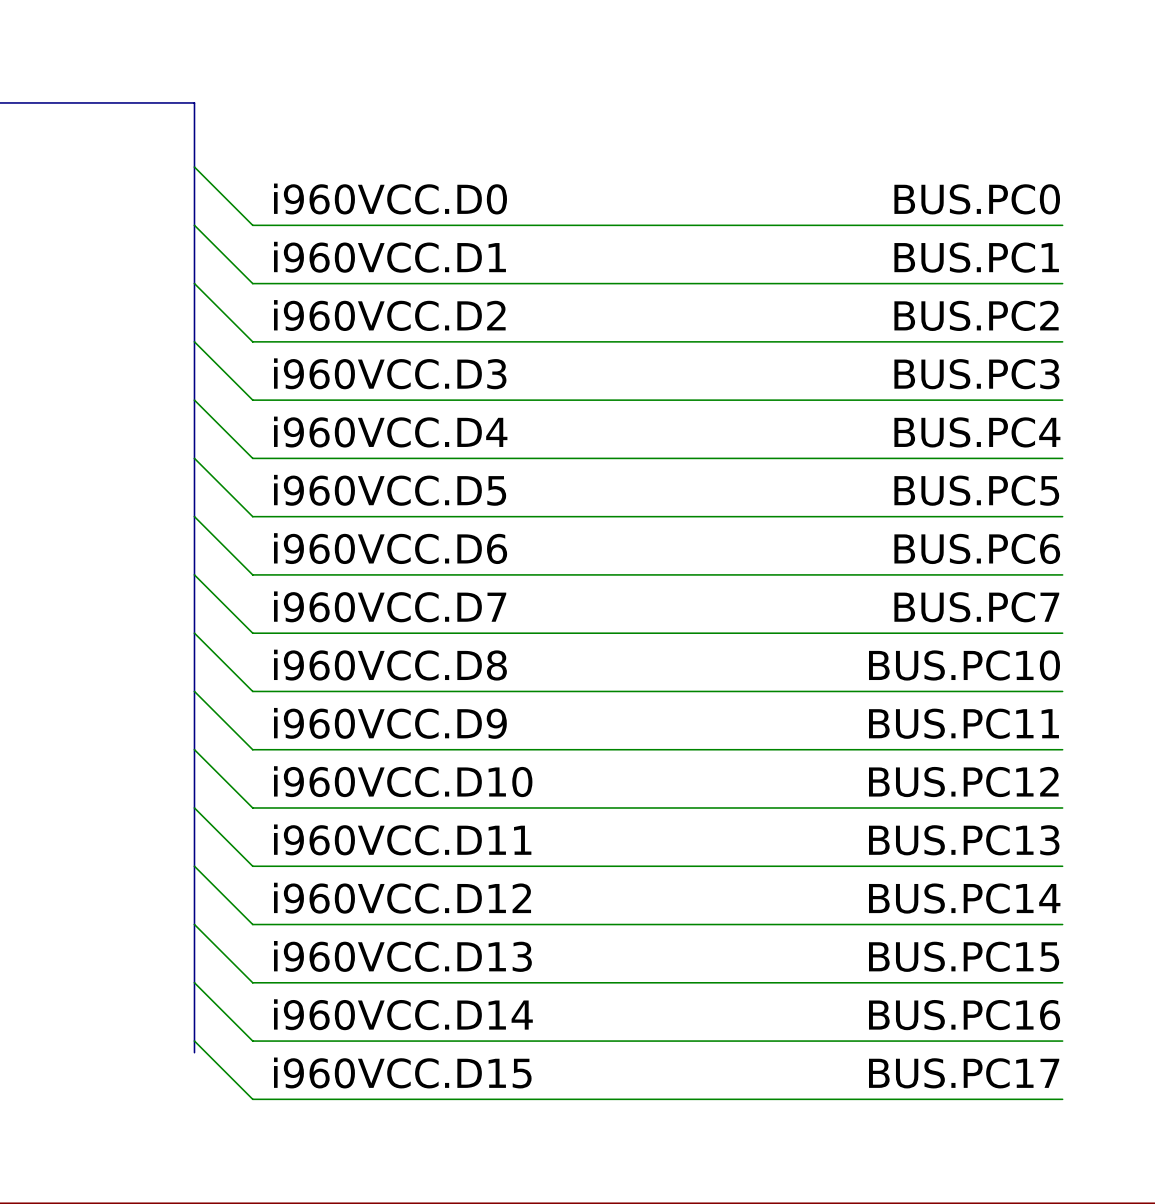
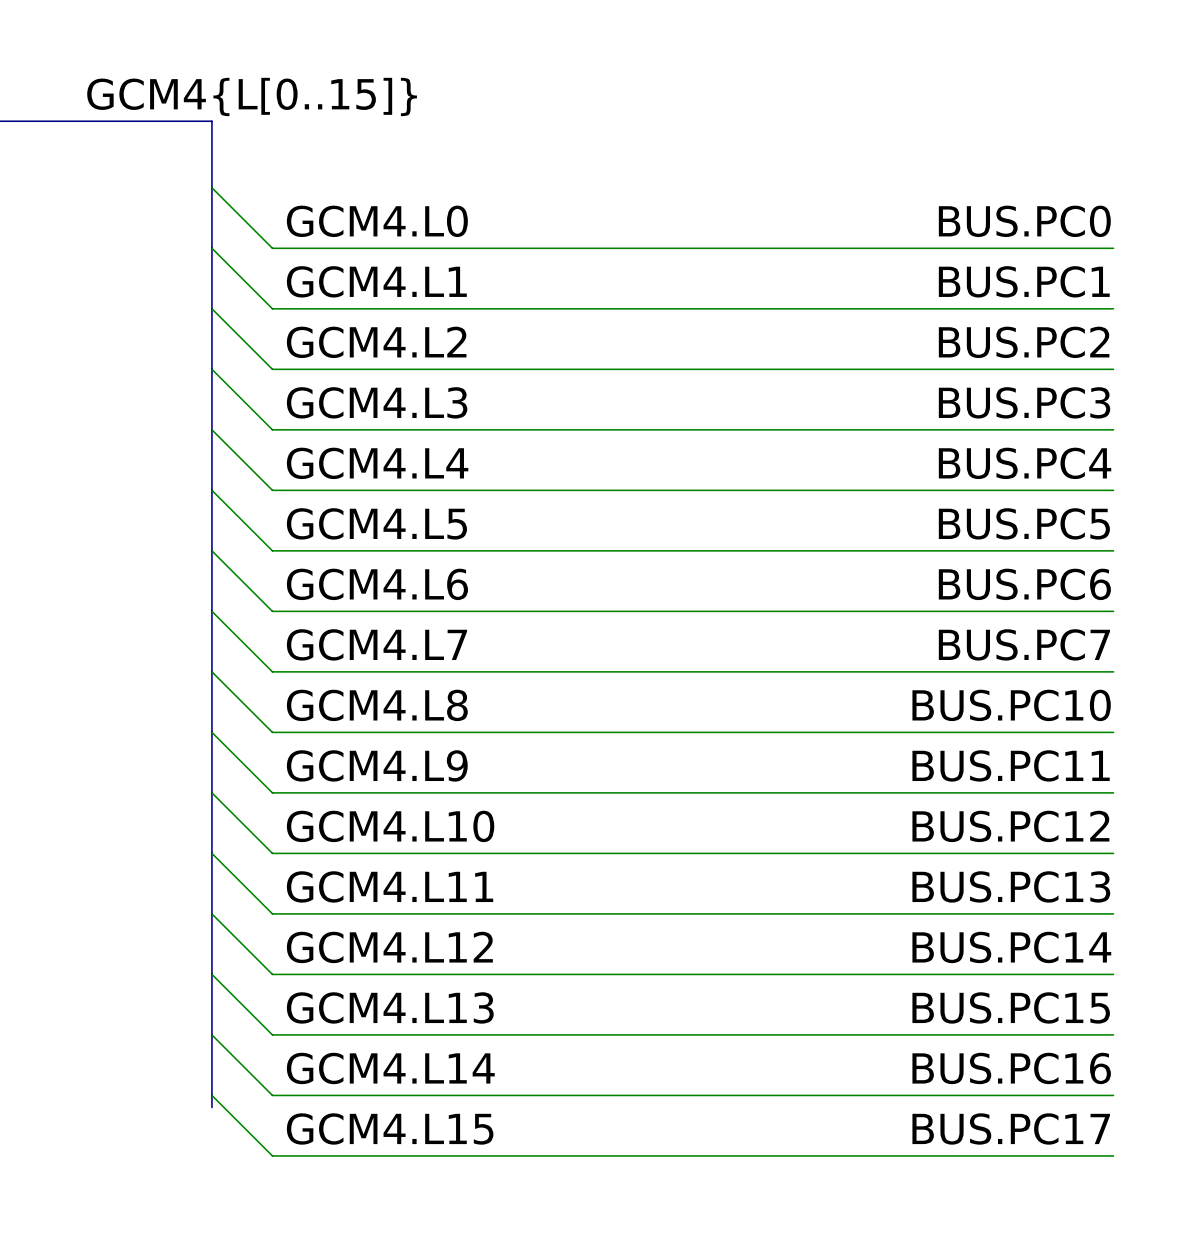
label: none -> GCM4{L[0..15]} (252, 96)
label: i960VCC.D0 (390, 199) -> GCM4.L0 (377, 221)
label: i960VCC.D1 (389, 257) -> GCM4.L1 (376, 281)
label: i960VCC.D2 (389, 315) -> GCM4.L2 (376, 342)
label: i960VCC.D3 (390, 373) -> GCM4.L3 (377, 402)
label: i960VCC.D4 (390, 432) -> GCM4.L4 (377, 463)
label: i960VCC.D5 (390, 490) -> GCM4.L5 (376, 523)
label: i960VCC.D6 (390, 548) -> GCM4.L6 (377, 584)
label: i960VCC.D7 (390, 606) -> GCM4.L7 (376, 644)
label: i960VCC.D8 (390, 665) -> GCM4.L8 (377, 705)
label: i960VCC.D9 (390, 723) -> GCM4.L9 (377, 765)
label: i960VCC.D10 (403, 781) -> GCM4.L10 (390, 826)
label: i960VCC.D11 (402, 839) -> GCM4.L11 (390, 886)
label: i960VCC.D12 (402, 898) -> GCM4.L12 (389, 947)
label: i960VCC.D13 (402, 956) -> GCM4.L13 (390, 1007)
label: i960VCC.D14 (403, 1014) -> GCM4.L14 (390, 1068)
label: i960VCC.D15 (402, 1072) -> GCM4.L15 (390, 1128)

